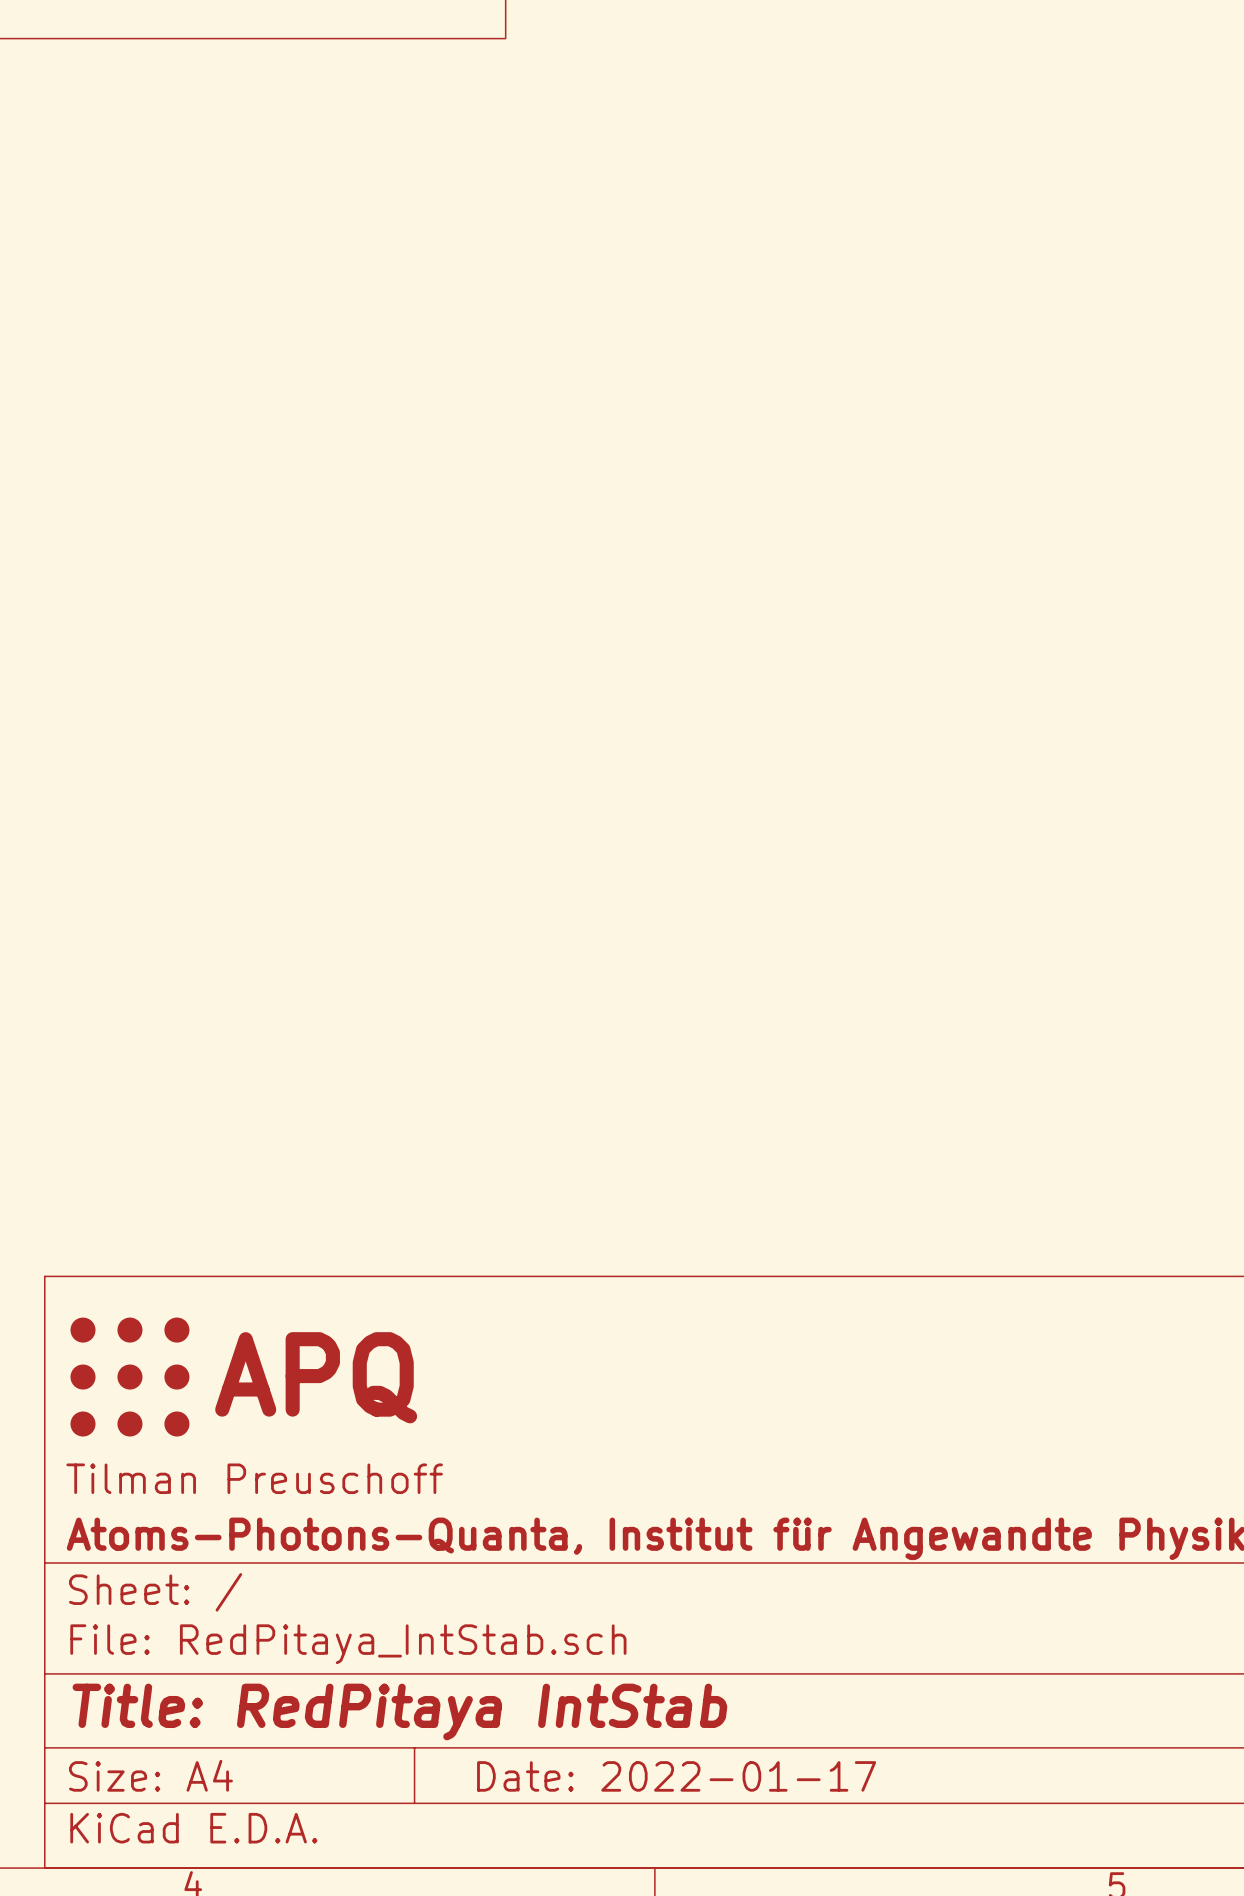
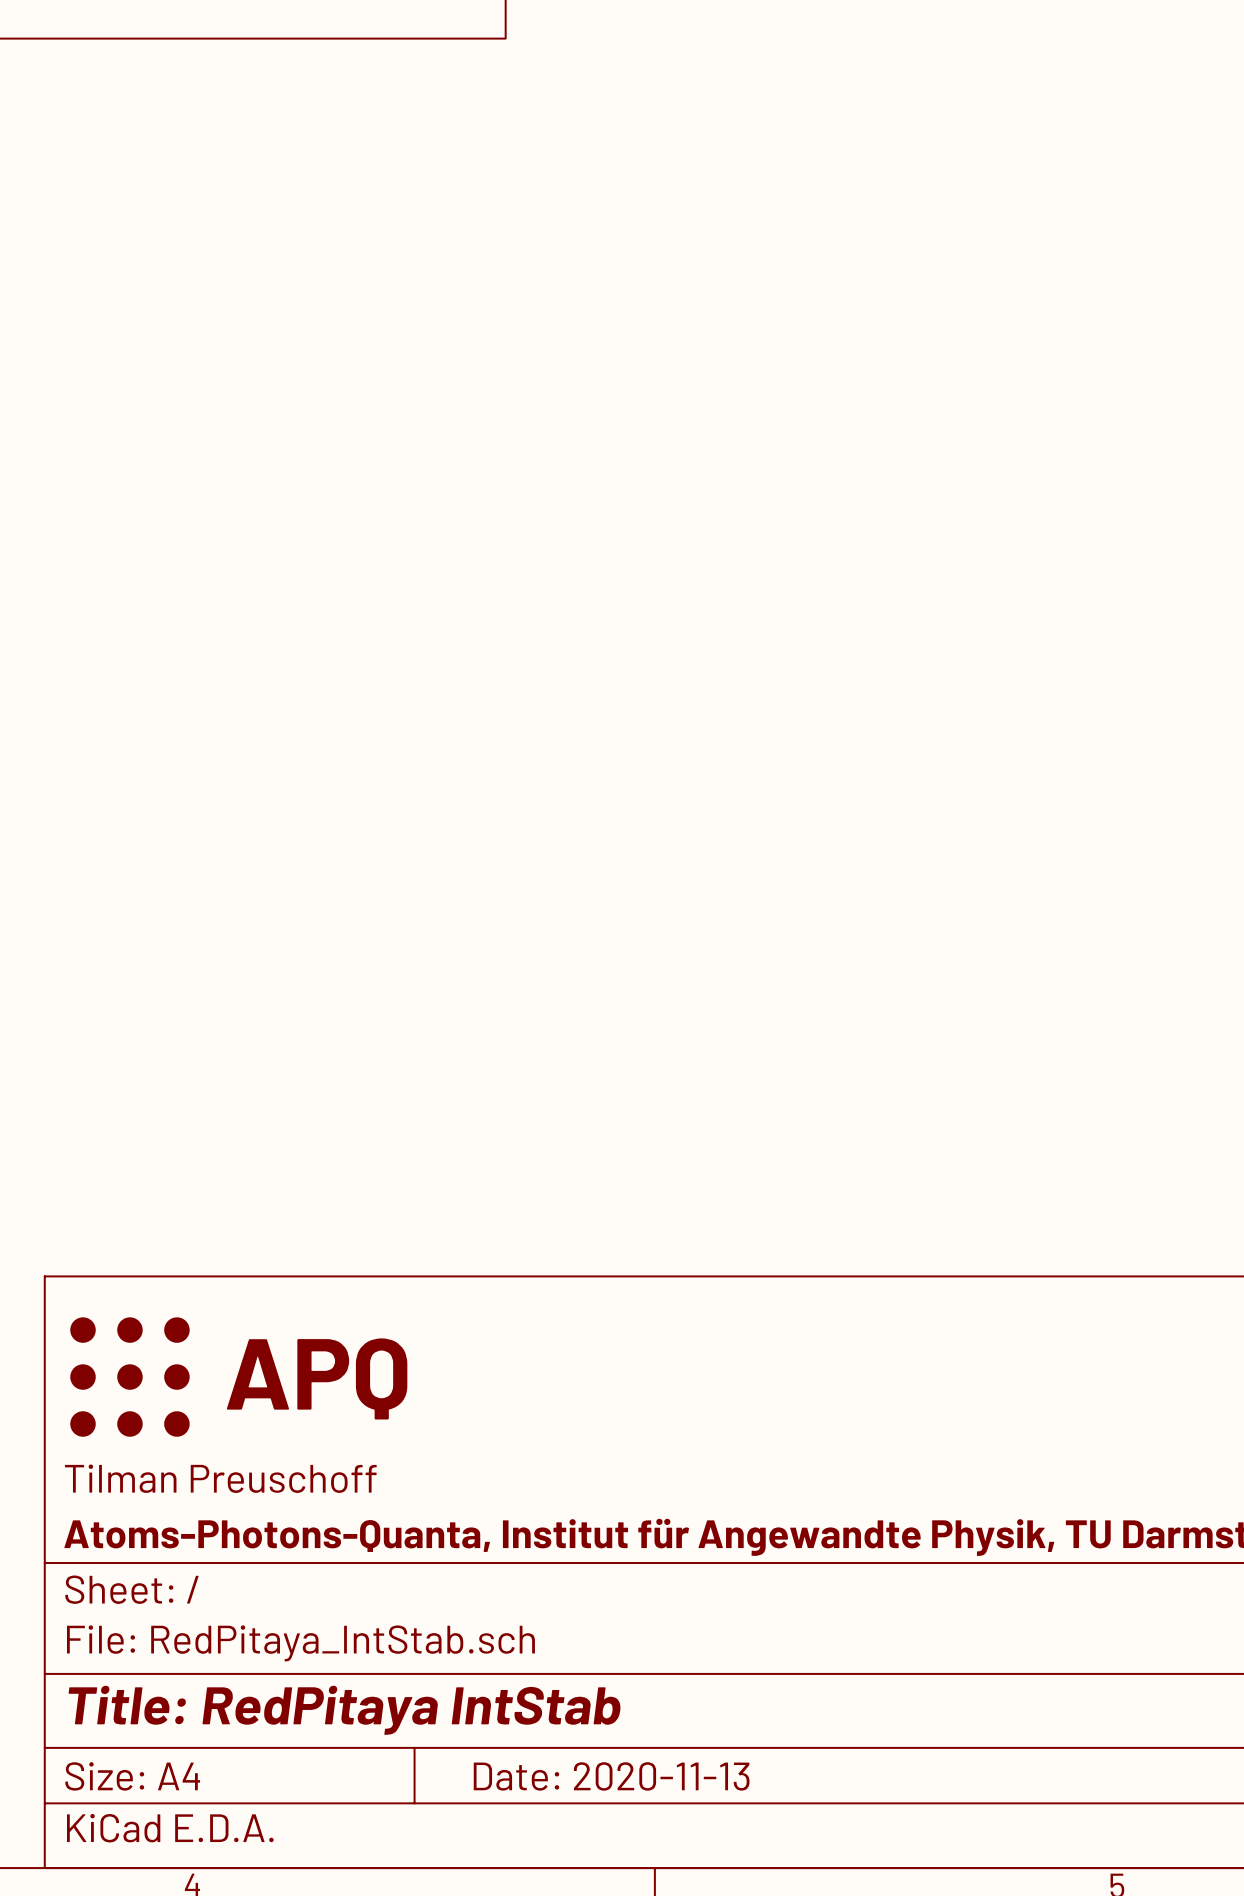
title block: Date: 2022-01-17 (676, 1776) -> Date: 2020-11-13 (611, 1776)

